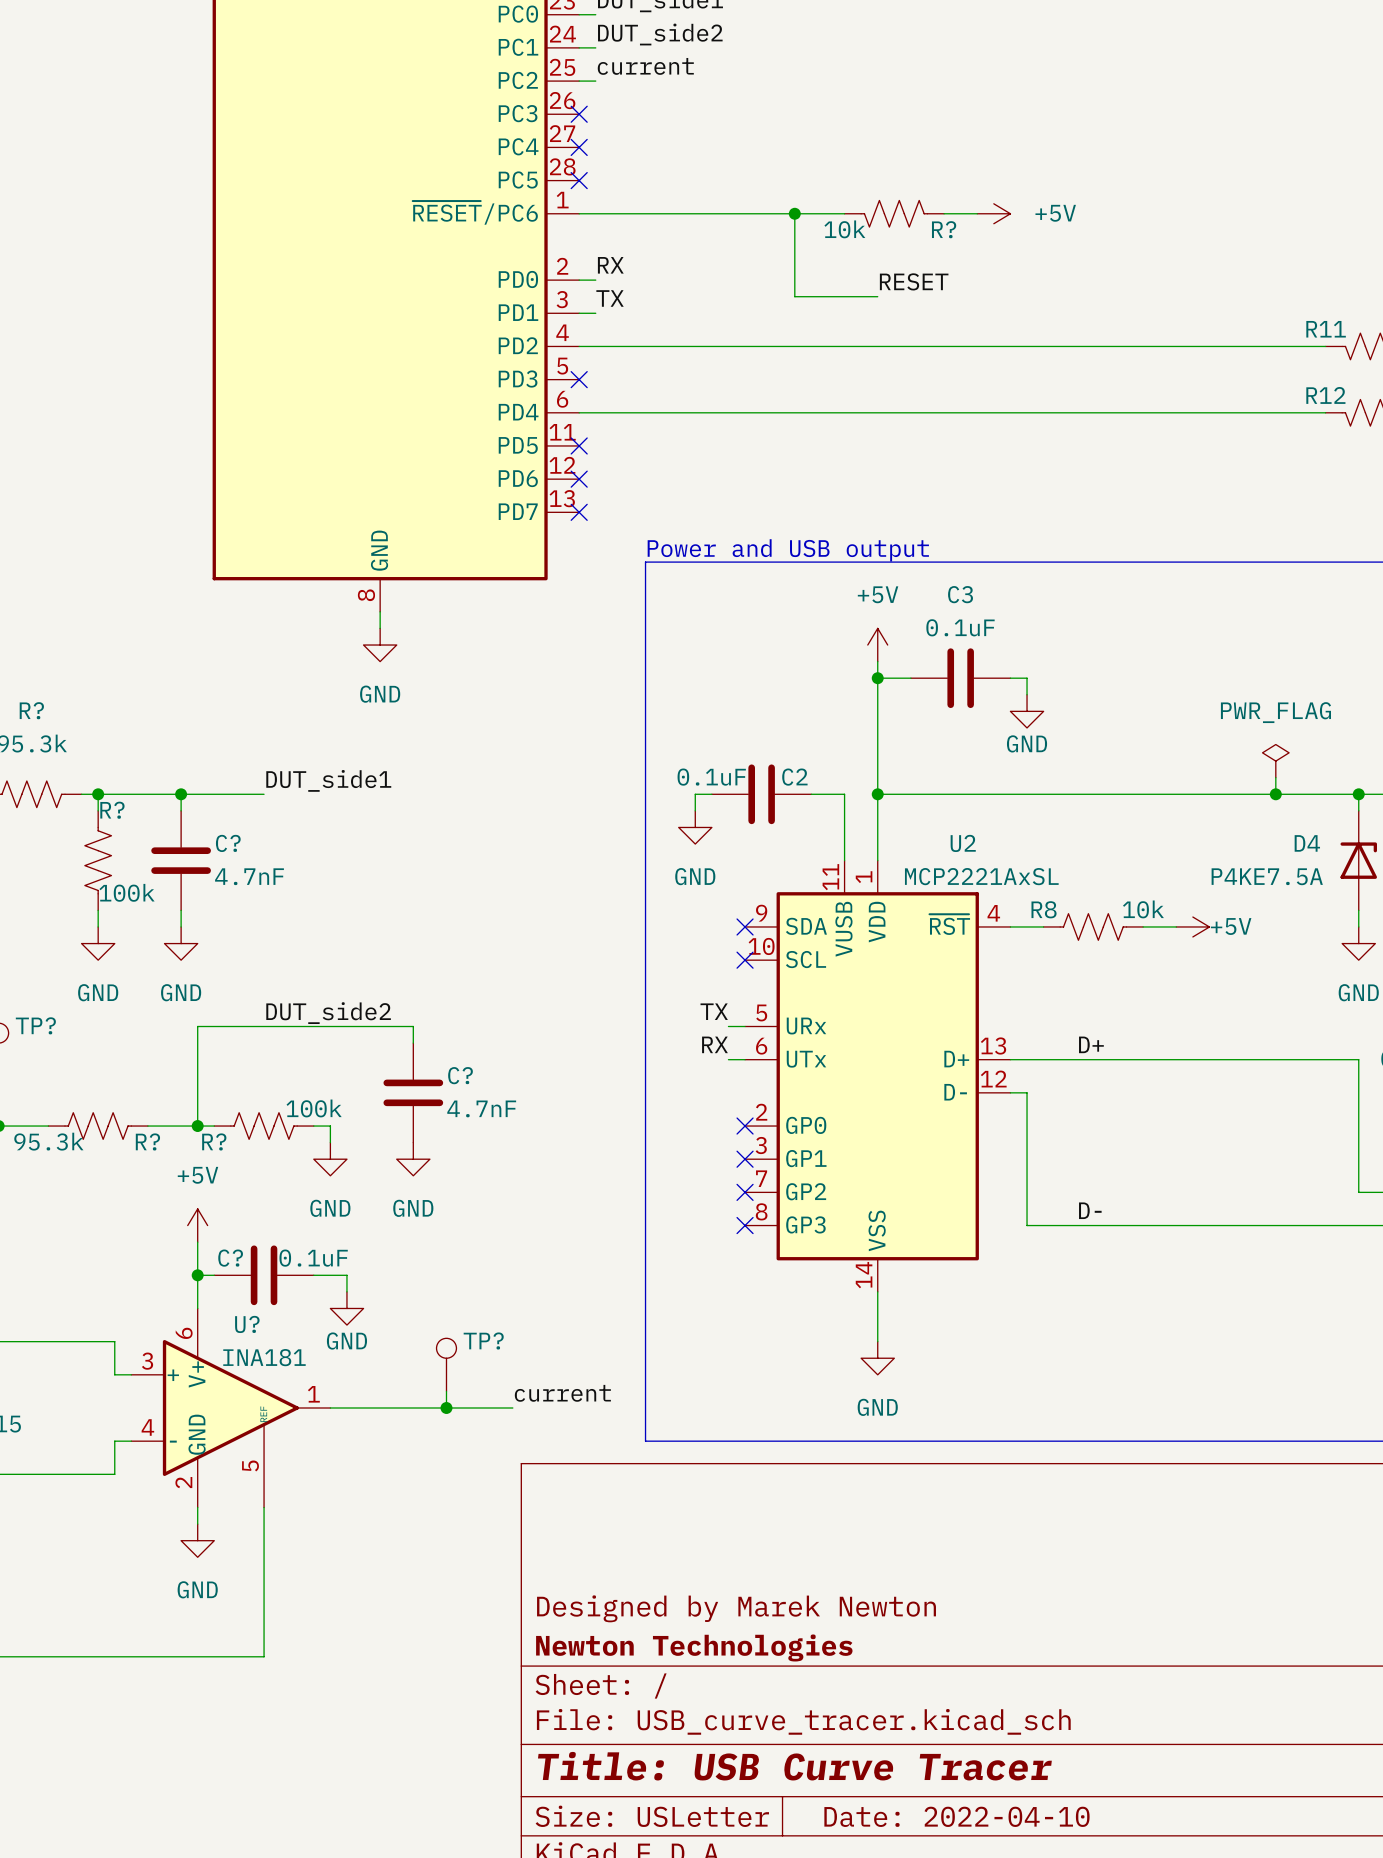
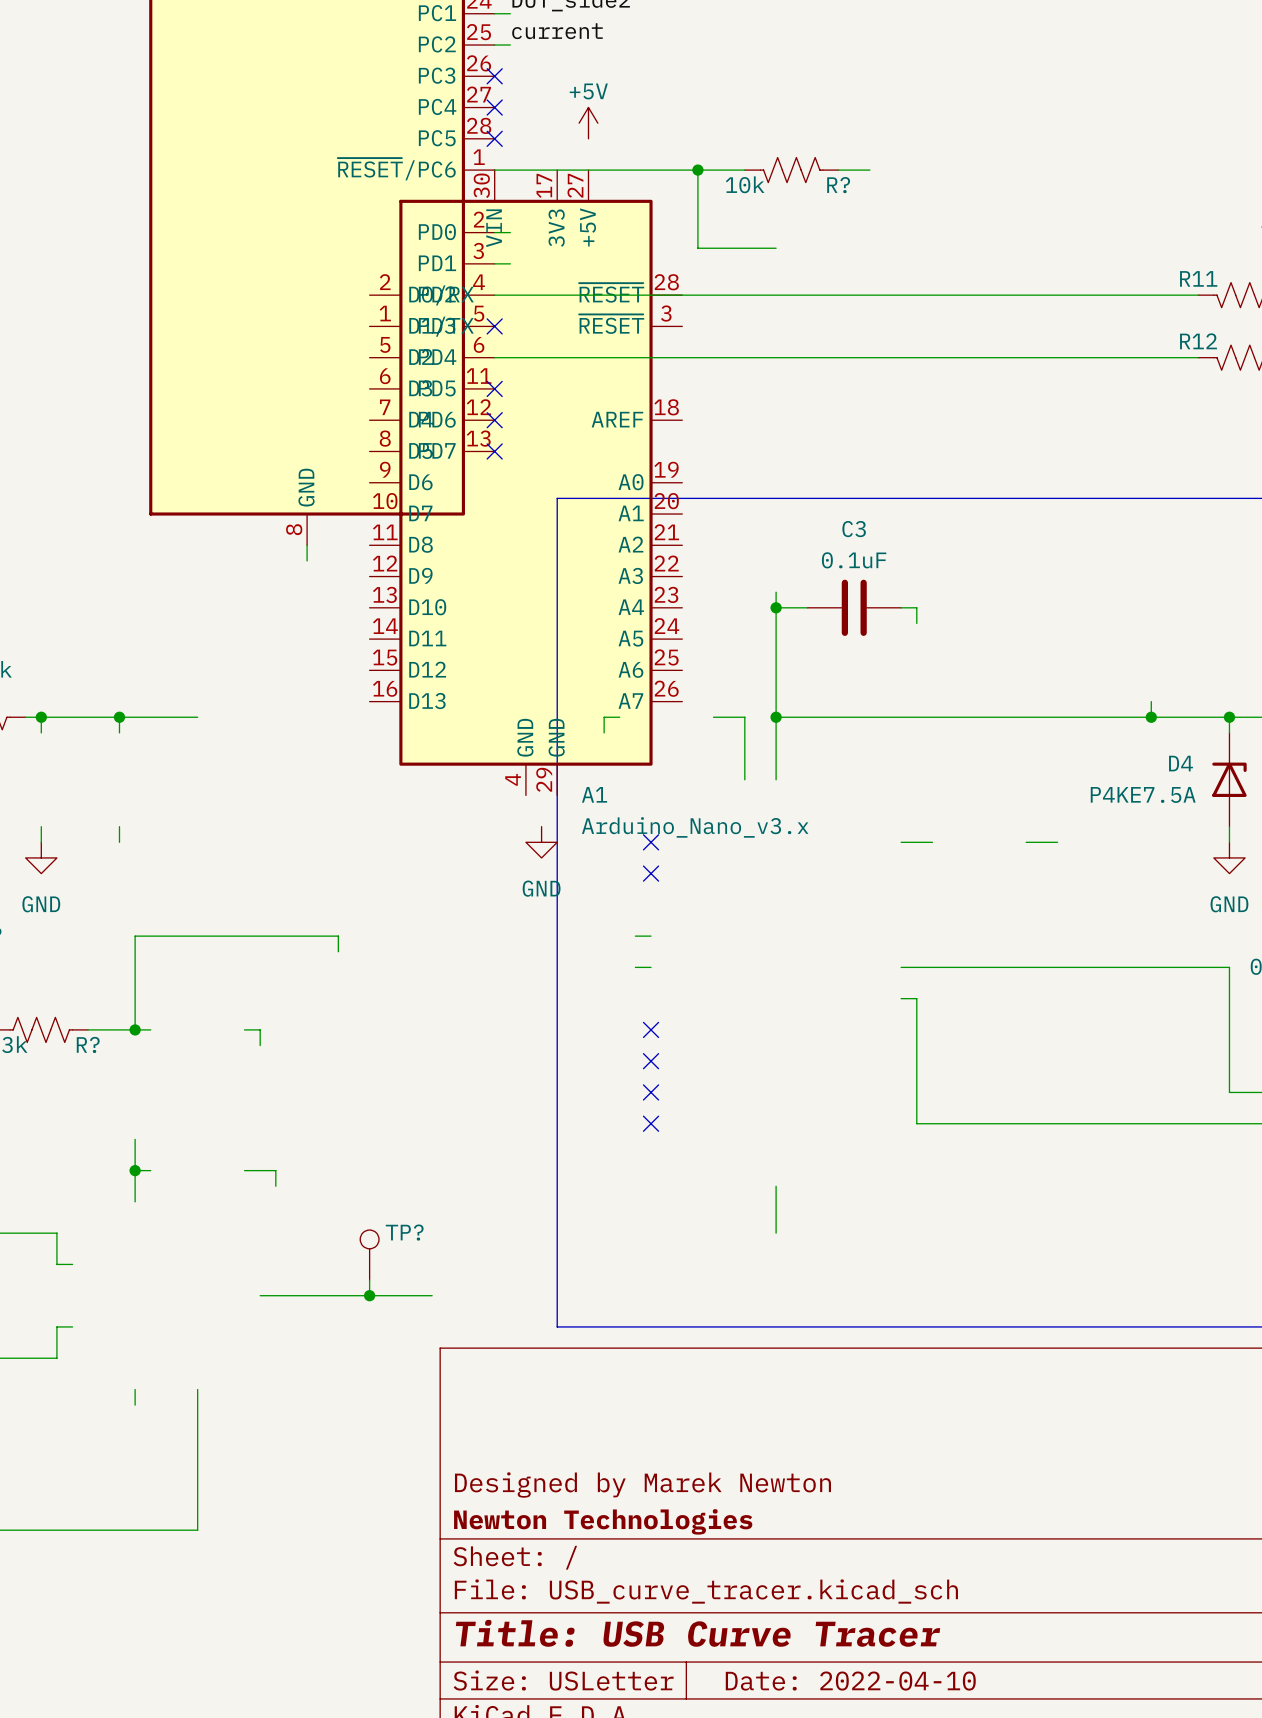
power symbol: none -> +5V (588, 123)
power symbol: +5V (993, 213) -> none
label: RX (610, 265) -> none
label: RESET (914, 281) -> none
label: TX (610, 298) -> none
A1: none -> Arduino_Nano_v3.x (525, 482)
text: Power and USB output (788, 550) -> none
power symbol: GND (380, 645) -> none
power symbol: +5V (877, 645) -> none
power symbol: GND (1027, 711) -> none
power symbol: PWR_FLAG (1275, 761) -> none
label: DUT_side1 (328, 780) -> none
C2: 0.1uF (761, 794) -> none
power symbol position: GND (695, 827) -> GND (541, 842)
R?: 100k (98, 860) -> none
C?: 4.7nF (181, 860) -> none
R8: 10k (1093, 926) -> none
power symbol: +5V (1192, 926) -> none
power symbol: GND (181, 943) -> none
label: TX (714, 1011) -> none
label: DUT_side2 (328, 1013) -> none
label: RX (714, 1044) -> none
label: D+ (1091, 1044) -> none
U2: MCP2221AxSL (877, 1076) -> none
C?: 4.7nF (413, 1092) -> none
R?: 100k (264, 1126) -> none
power symbol: GND (330, 1159) -> none
power symbol: GND (413, 1159) -> none
label: D- (1090, 1210) -> none
power symbol: +5V (197, 1225) -> none
C?: 0.1uF (264, 1275) -> none
power symbol: GND (346, 1308) -> none
power symbol: GND (877, 1358) -> none
label: current (562, 1393) -> none
U?: INA181 (230, 1407) -> none
power symbol: GND (197, 1540) -> none

